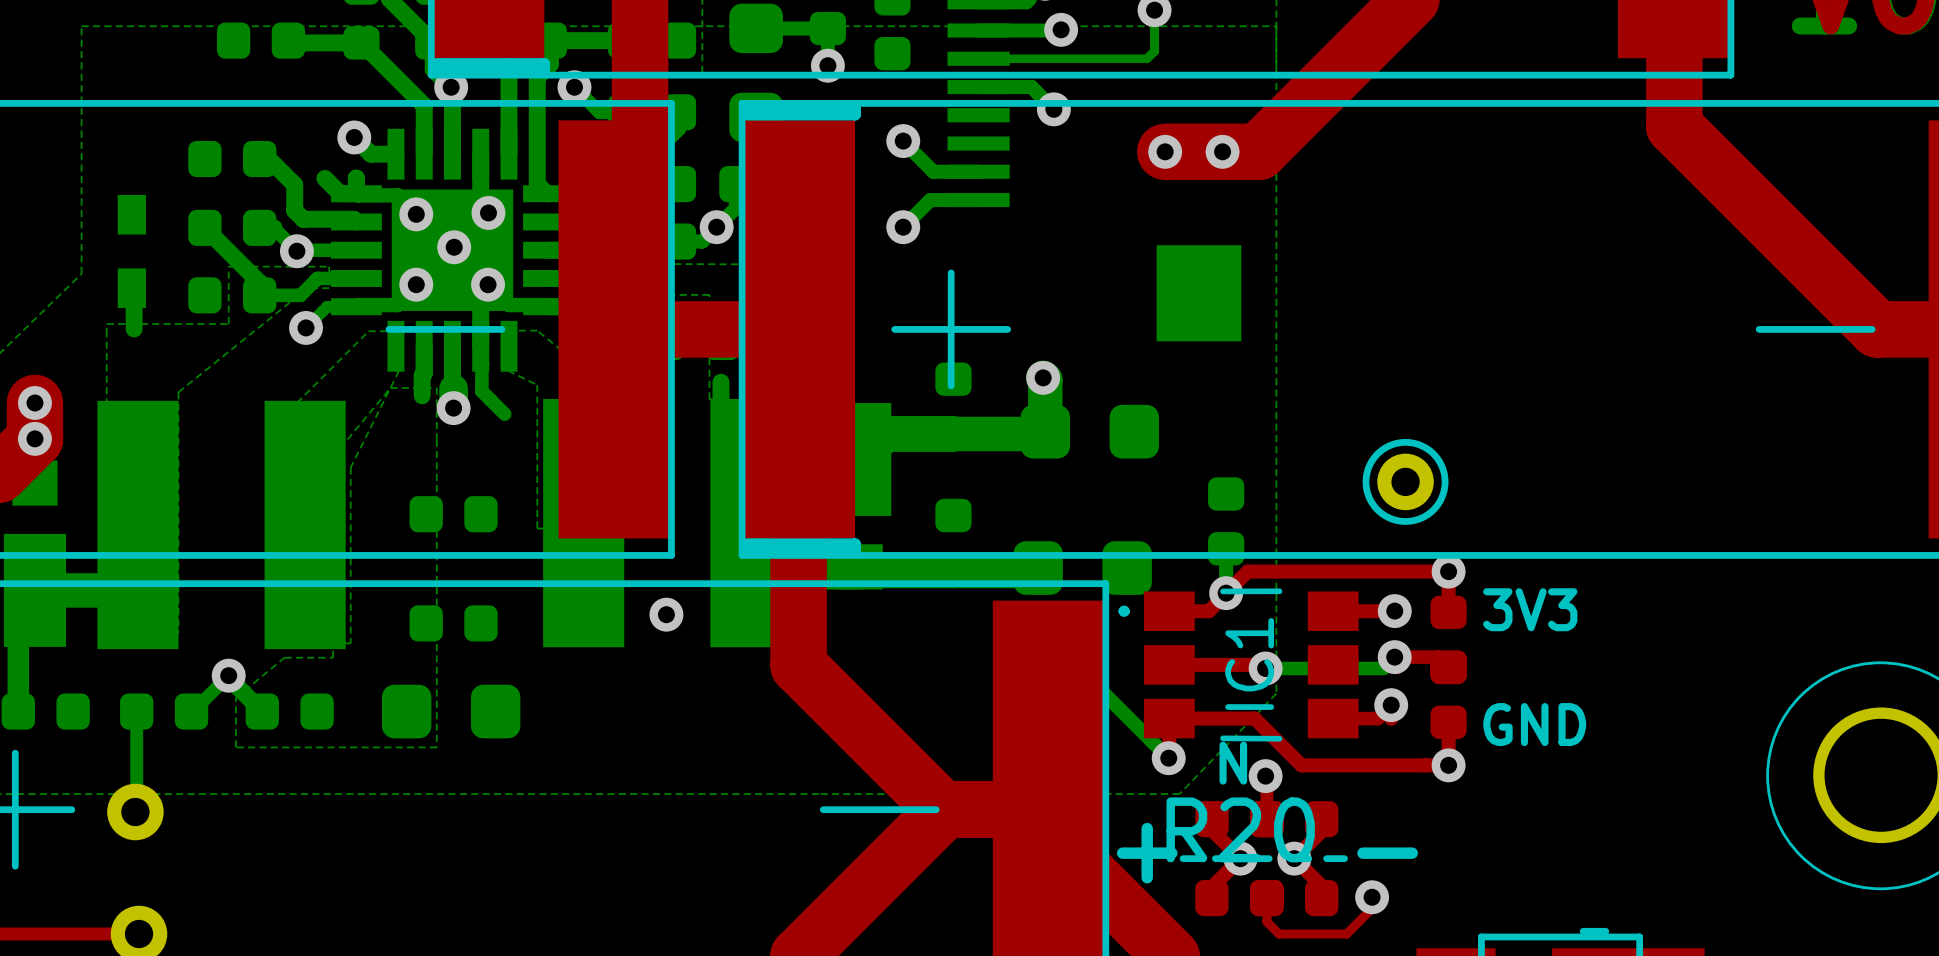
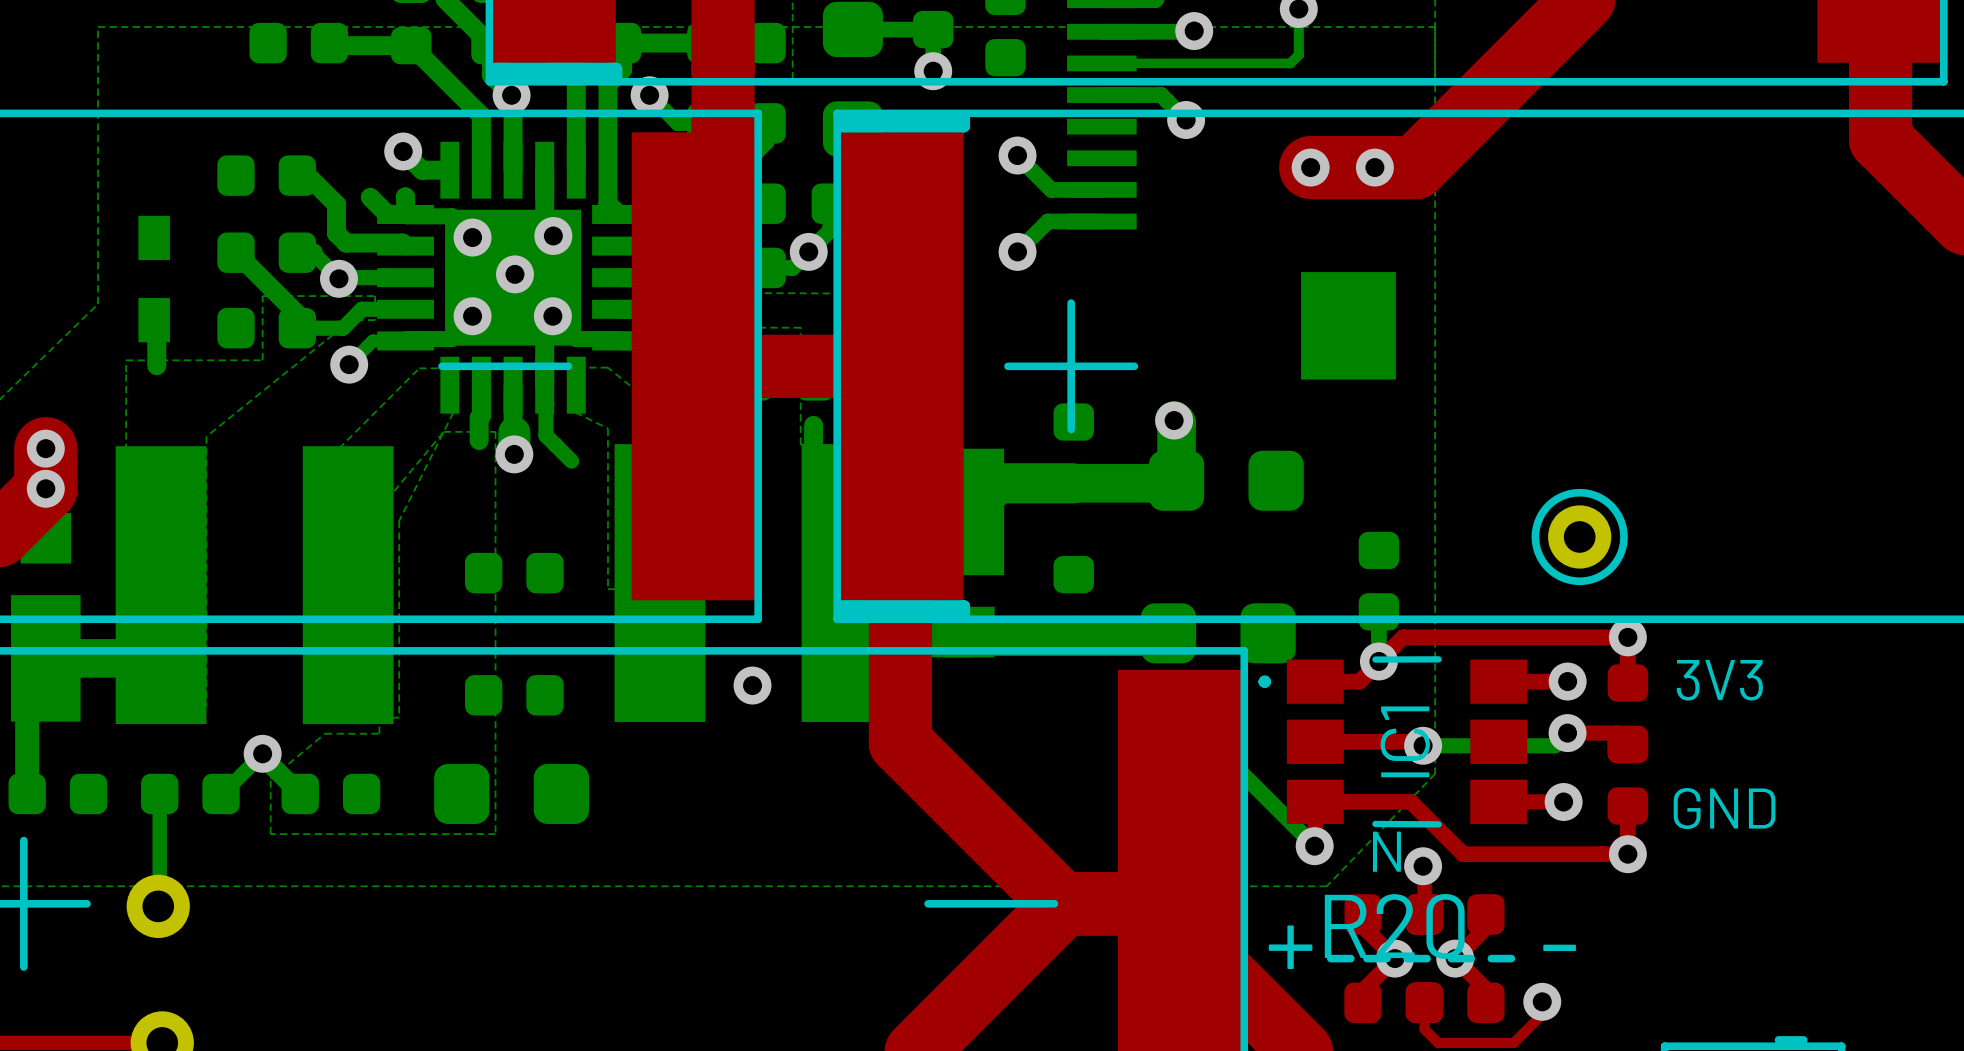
via position: (1391, 705) -> (1563, 802)

